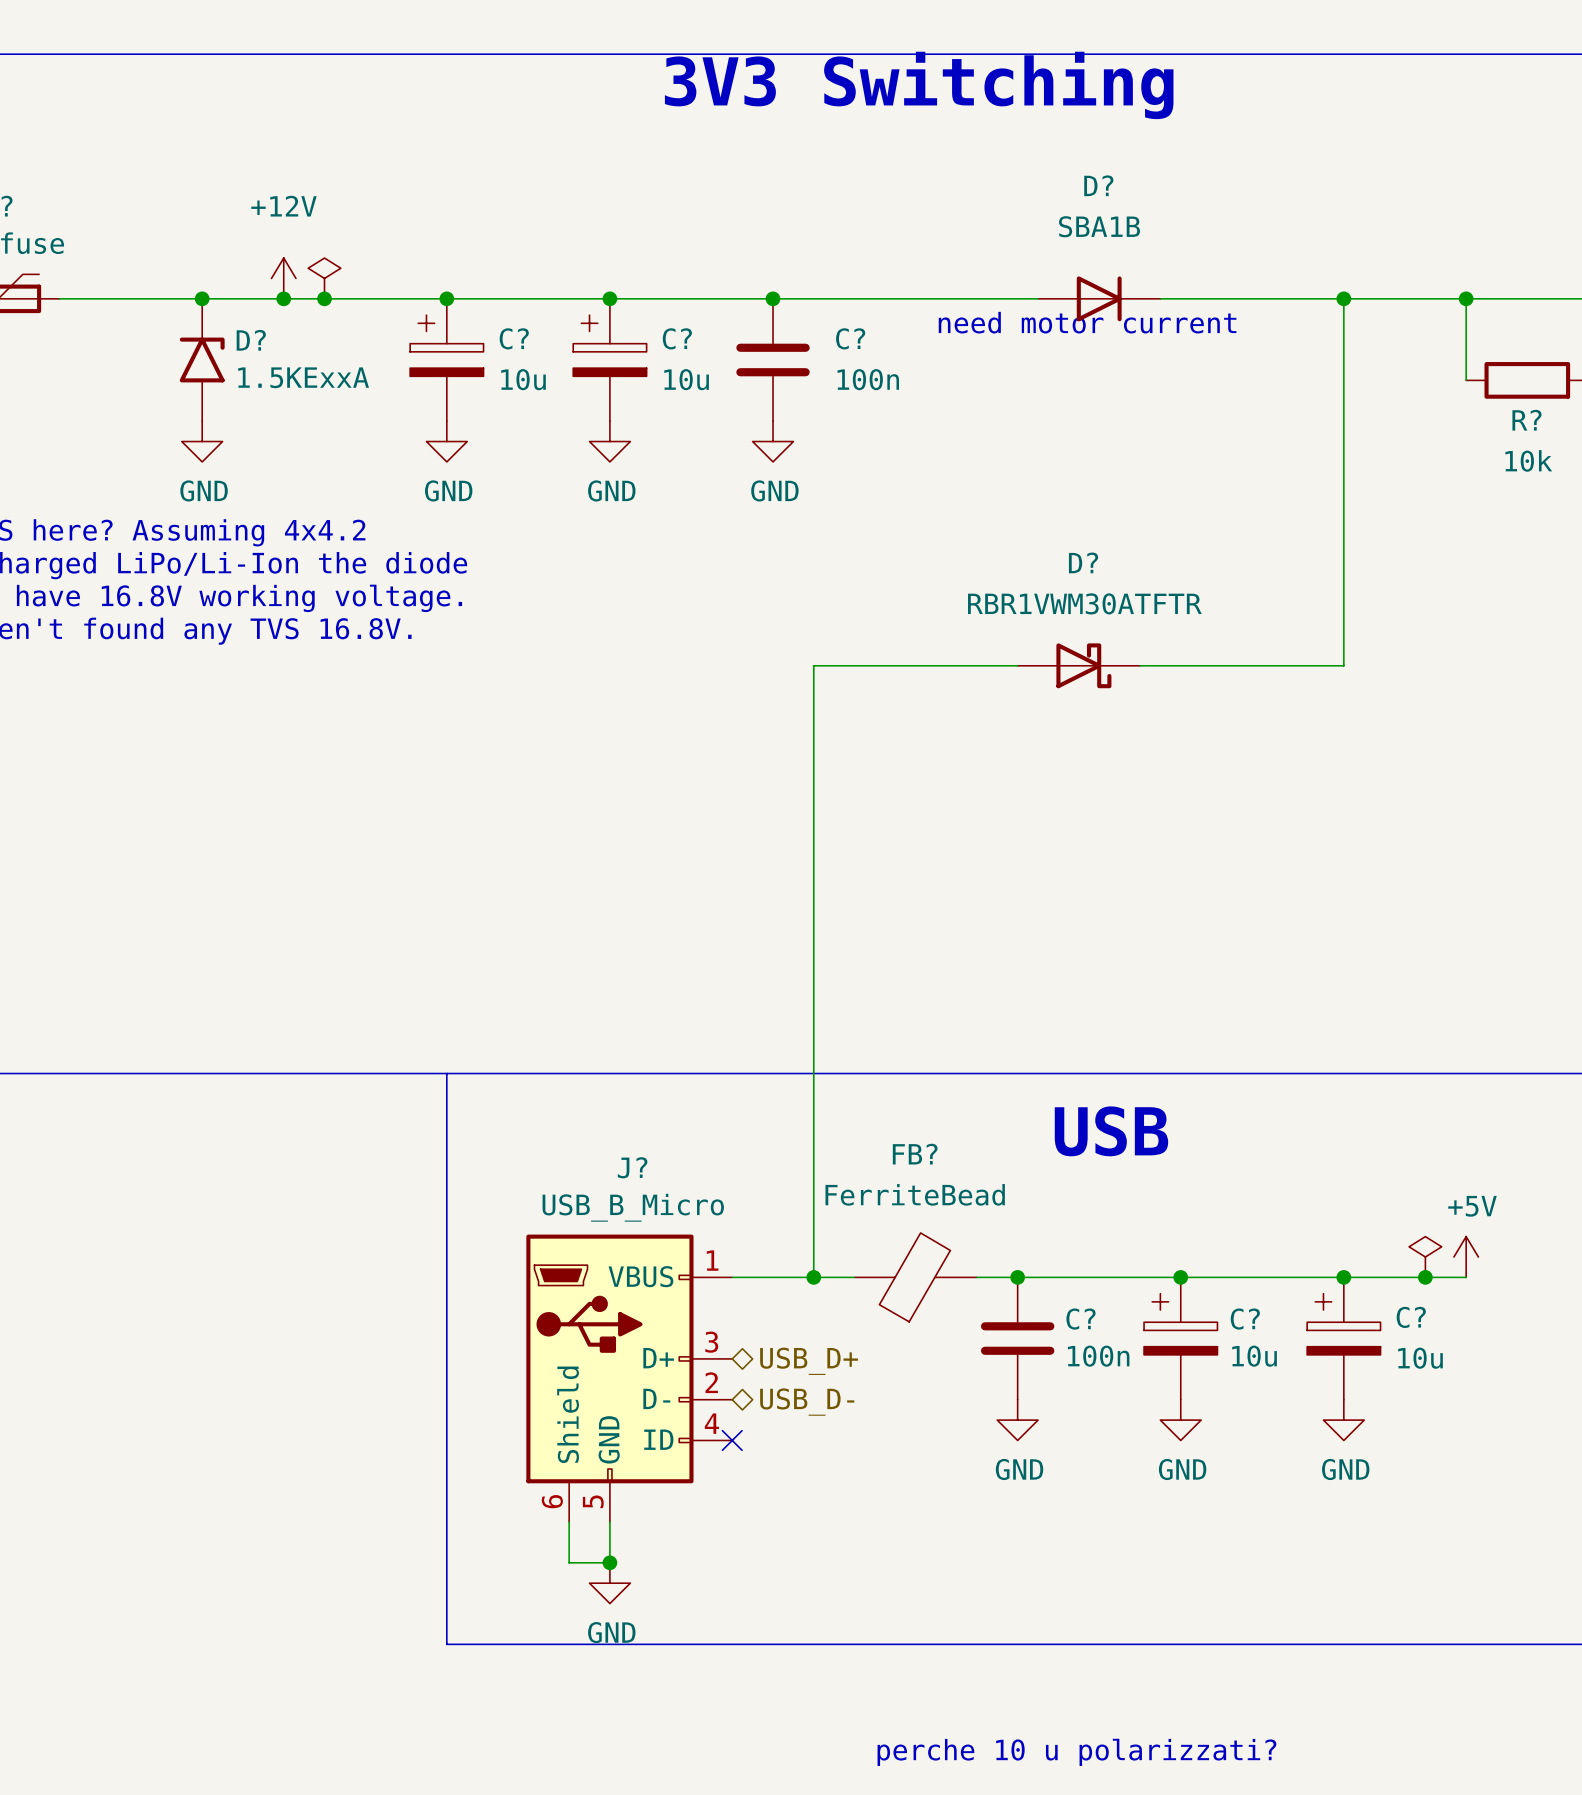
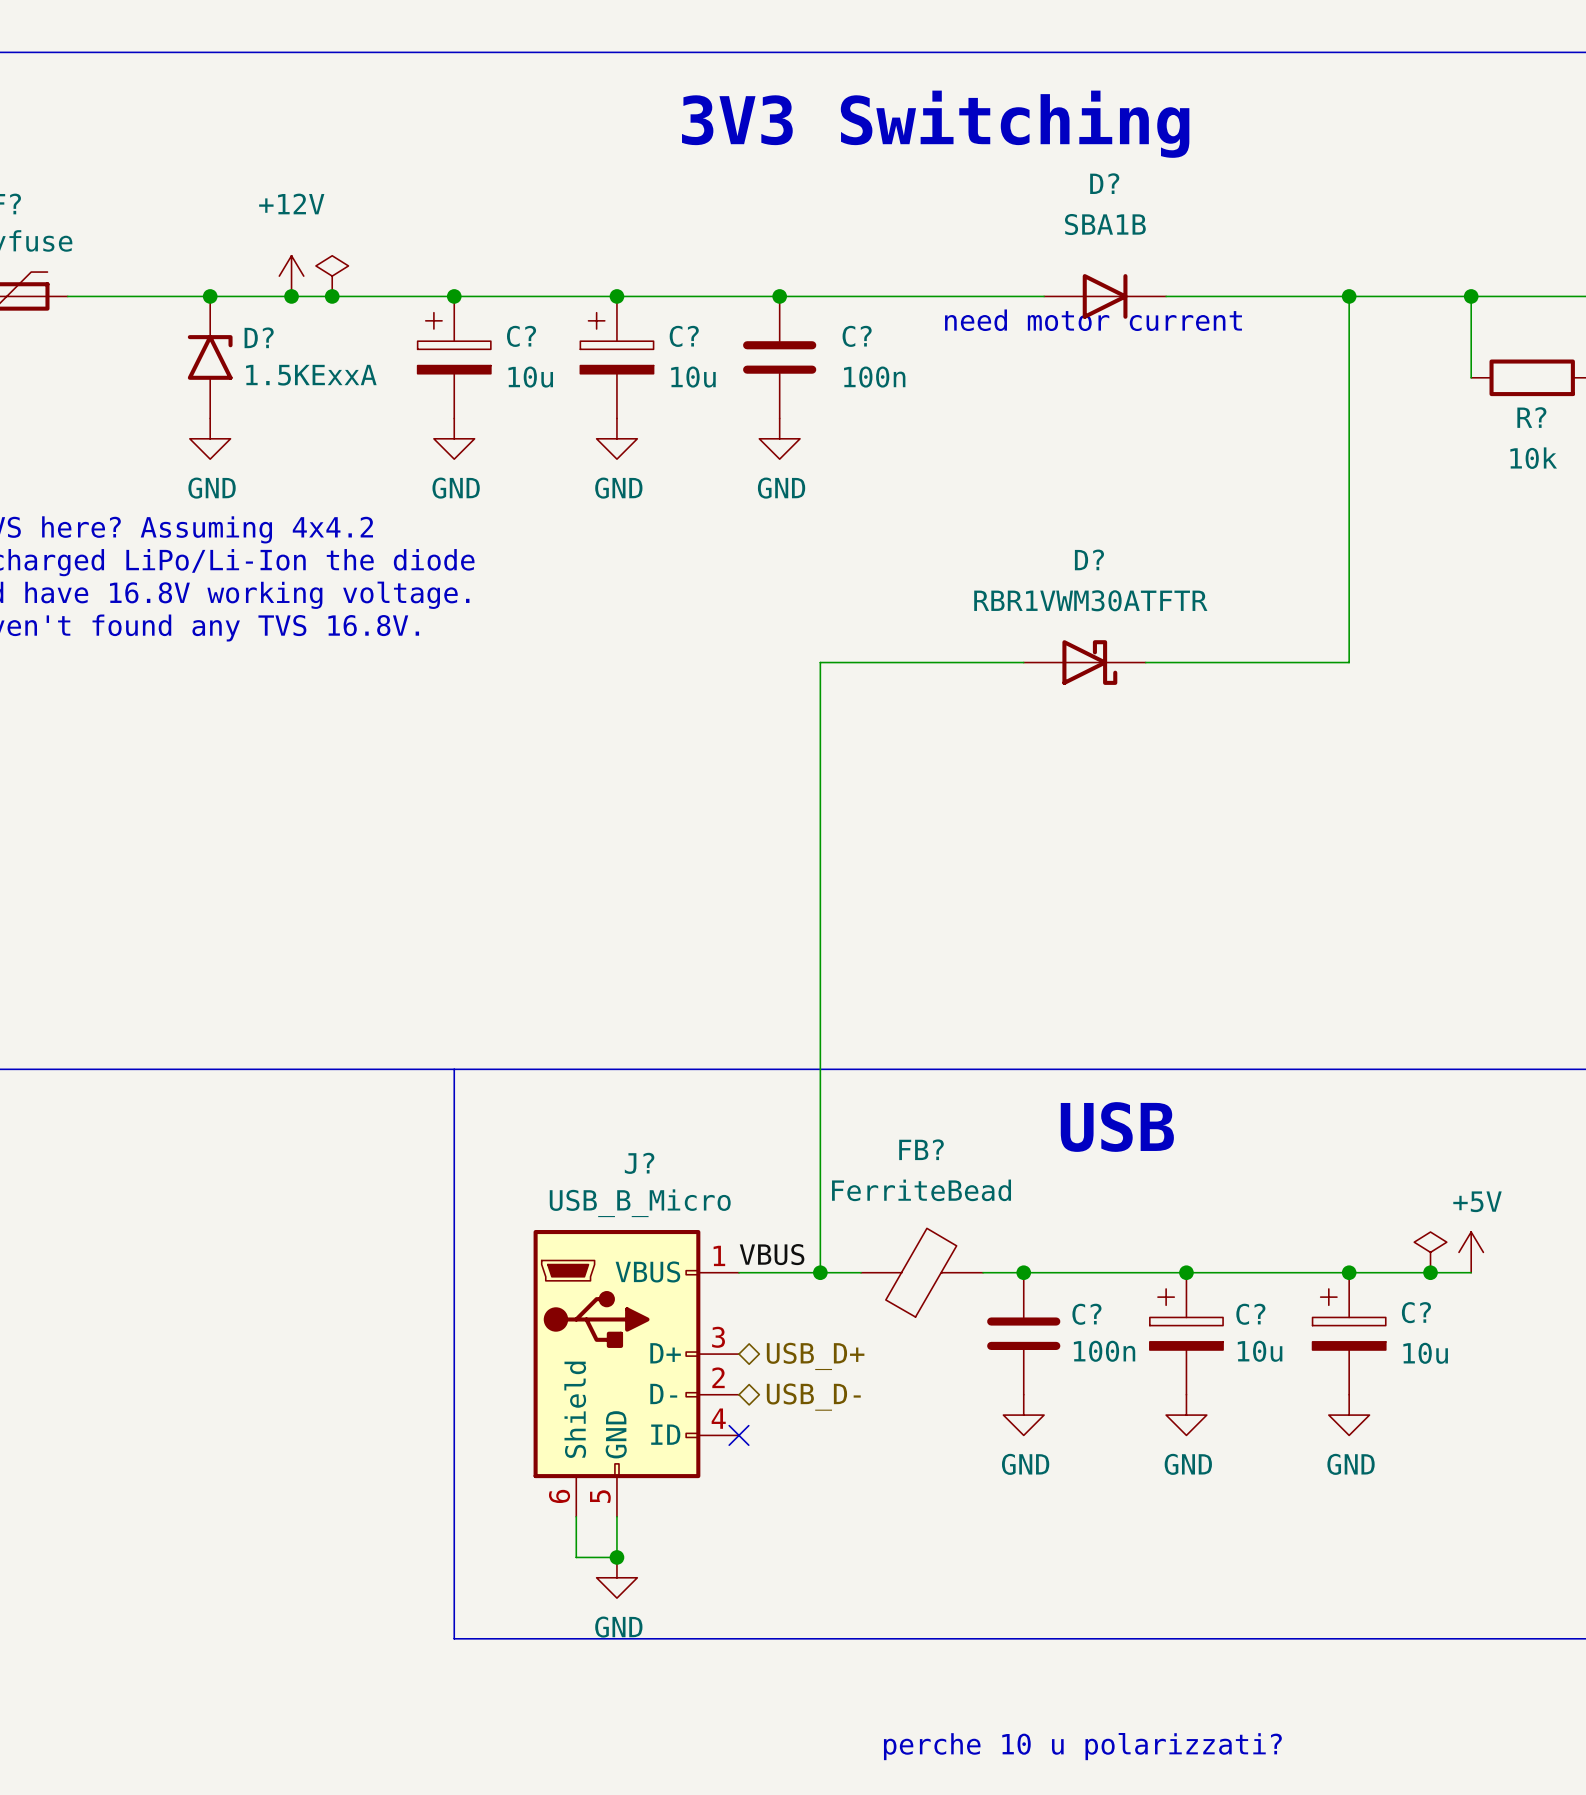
text position: 3V3 Switching (919, 85) -> 3V3 Switching (935, 124)
label: none -> VBUS (772, 1254)

